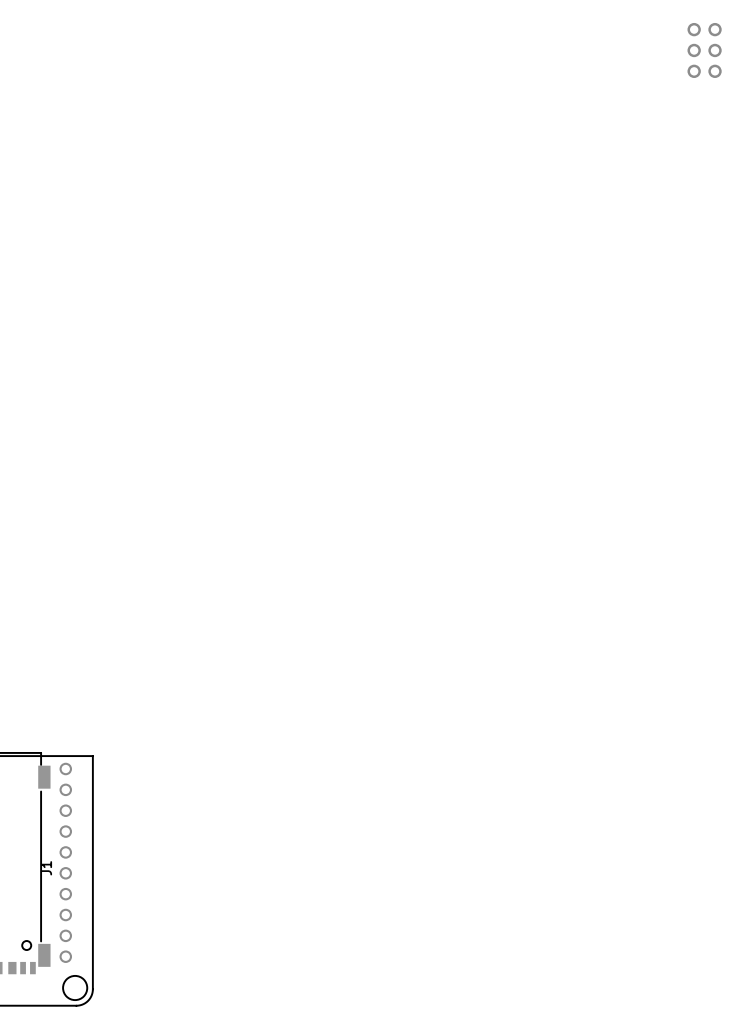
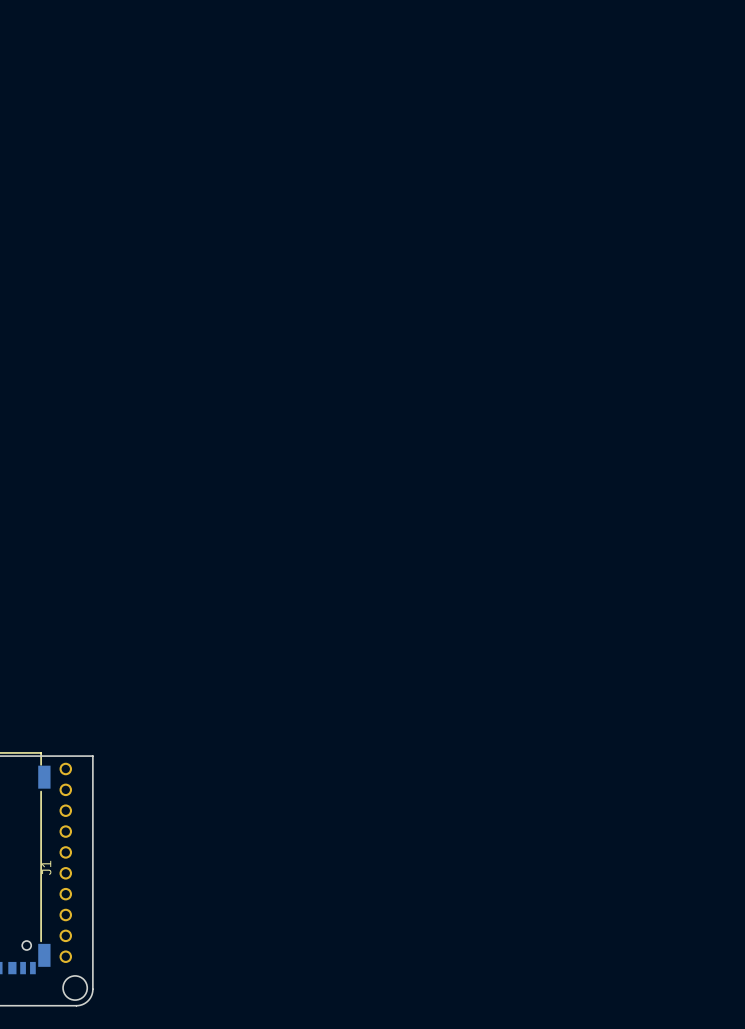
part: (704, 50) -> none

